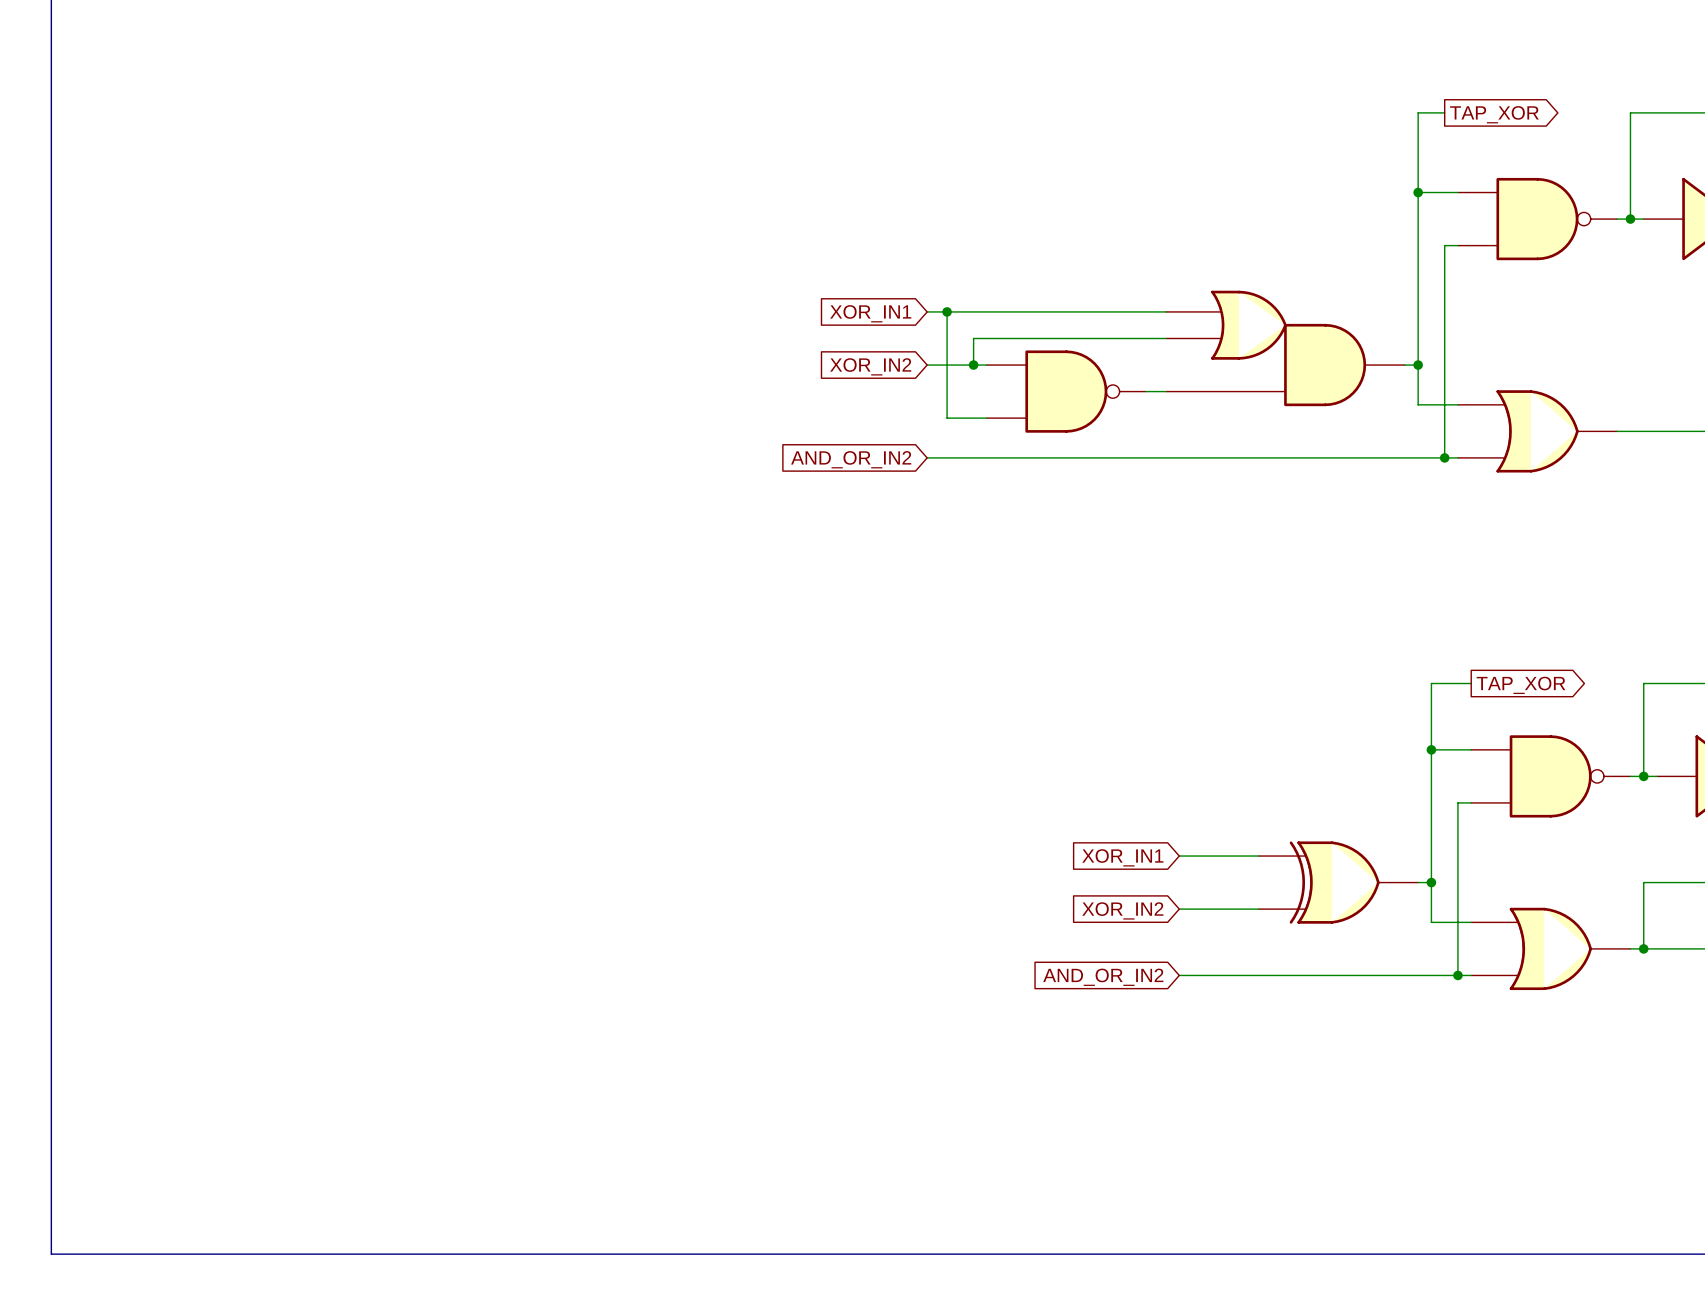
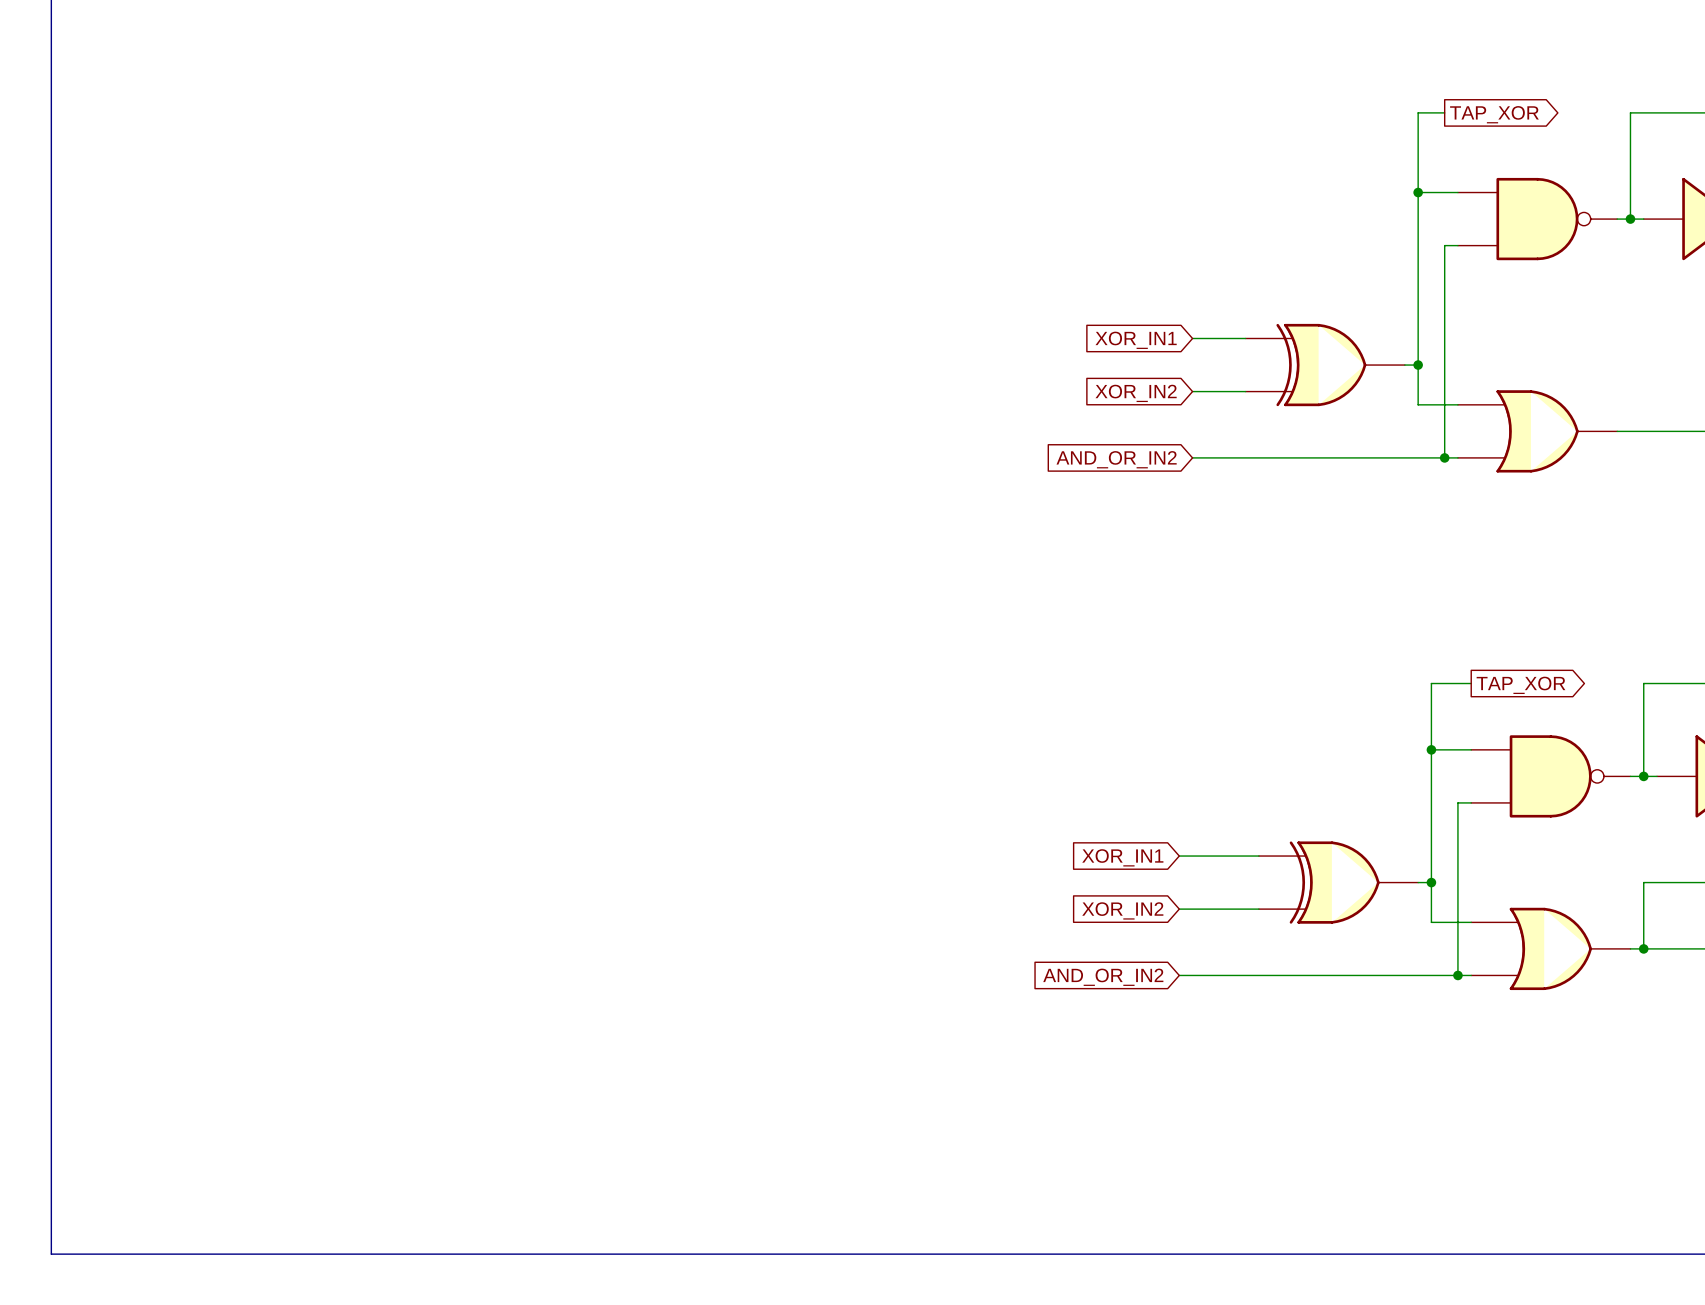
wire: (927, 311) (1166, 311) -> none
wire: (947, 311) (947, 418) (986, 418) -> none
junction: (947, 311) -> none
global label: XOR_IN1 (870, 313) -> none
wire: (1166, 338) (973, 338) (973, 365) -> none
global label: none -> XOR_IN1 (1136, 340)
part: (1285, 348) -> none
wire: (927, 365) (986, 365) -> none
junction: (973, 365) -> none
part: none -> (1325, 365)
global label: XOR_IN2 (870, 366) -> none
part: (1066, 391) -> none
wire: (1146, 391) (1166, 391) -> none
global label: none -> XOR_IN2 (1136, 393)
wire: (927, 457) (1192, 457) -> none
global label: AND_OR_IN2 (851, 459) -> none
global label: none -> AND_OR_IN2 (1116, 459)

